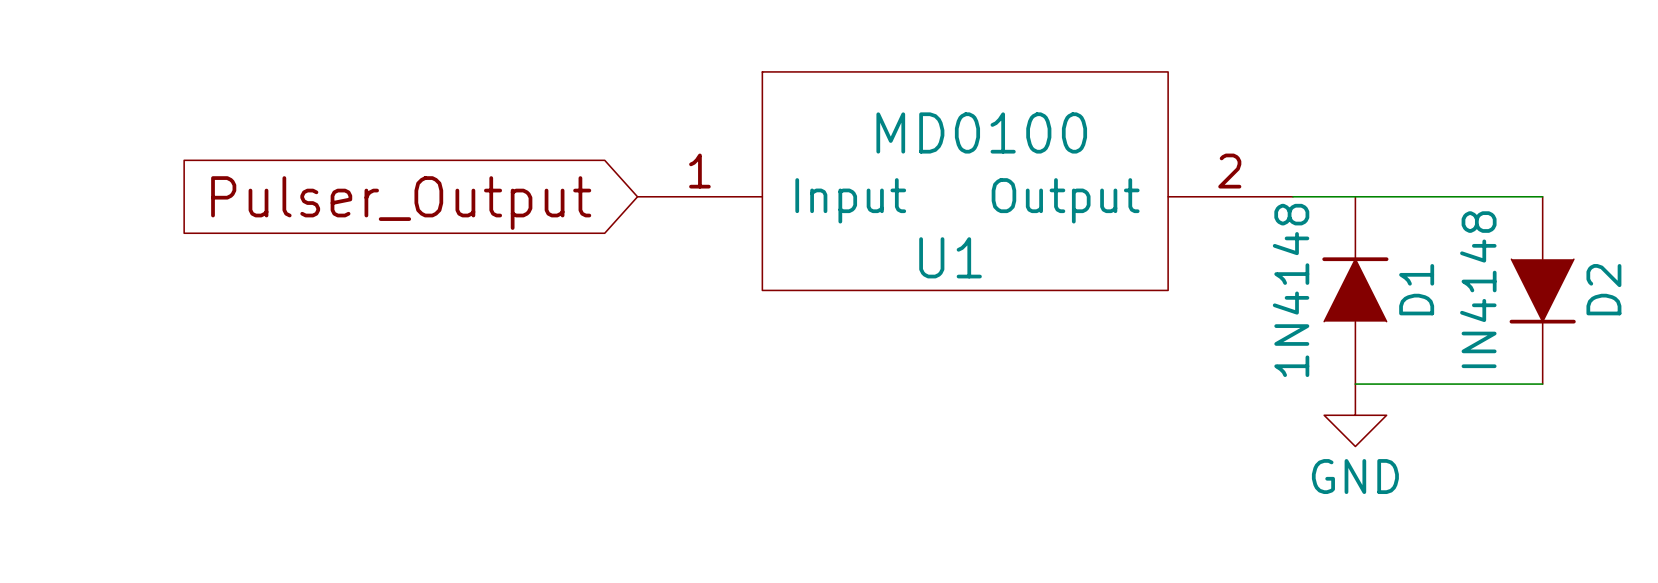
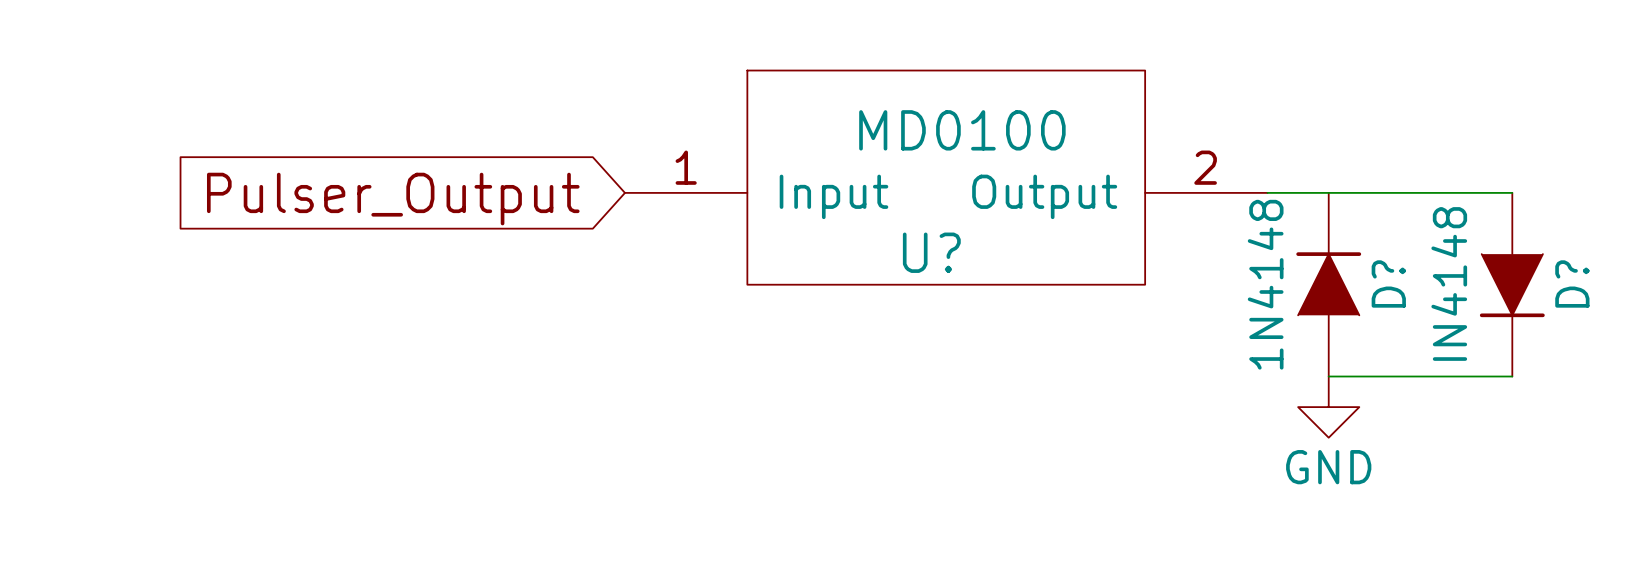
U1 name: U1 (950, 257) -> U? (931, 252)
D1 name: D1 (1416, 289) -> D? (1388, 283)
D2 name: D2 (1603, 289) -> D? (1572, 283)

